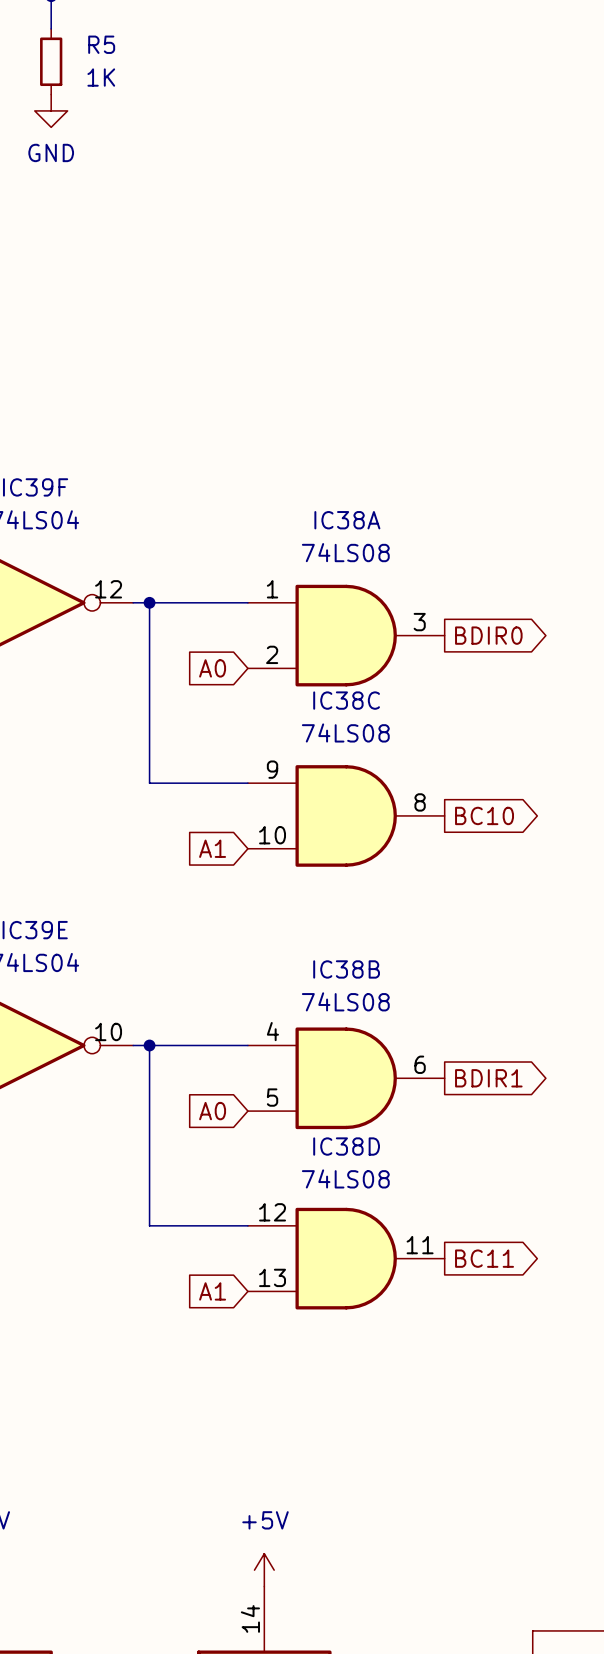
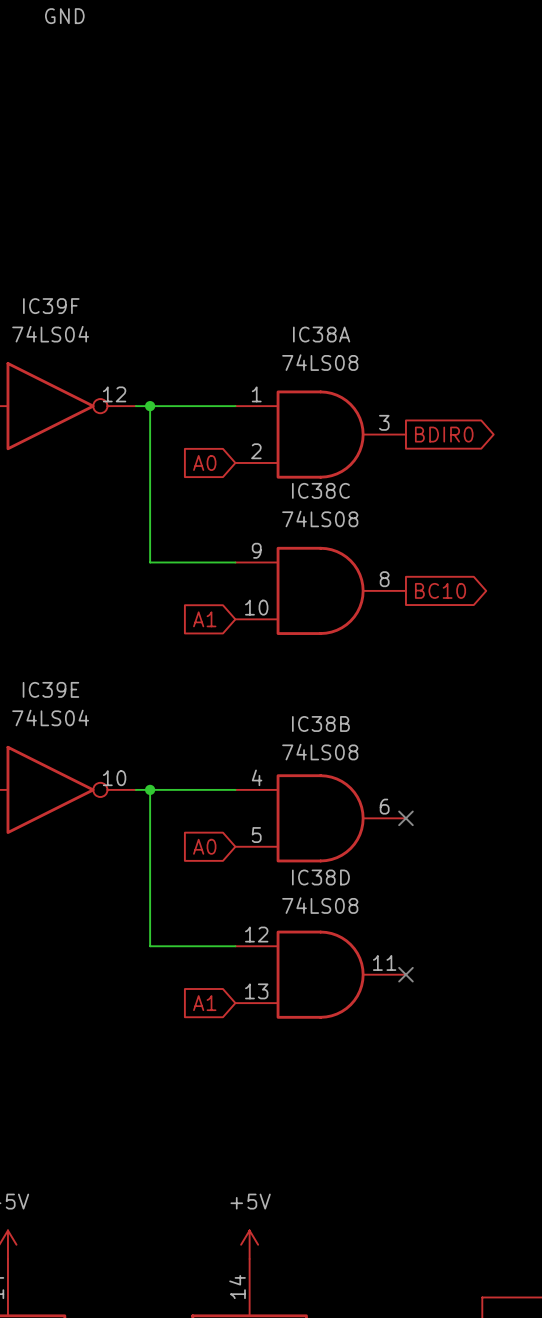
no-connect mark: none -> (405, 818)
global label: BDIR1 (488, 1078) -> none
no-connect mark: none -> (405, 974)
global label: BC11 (484, 1258) -> none

